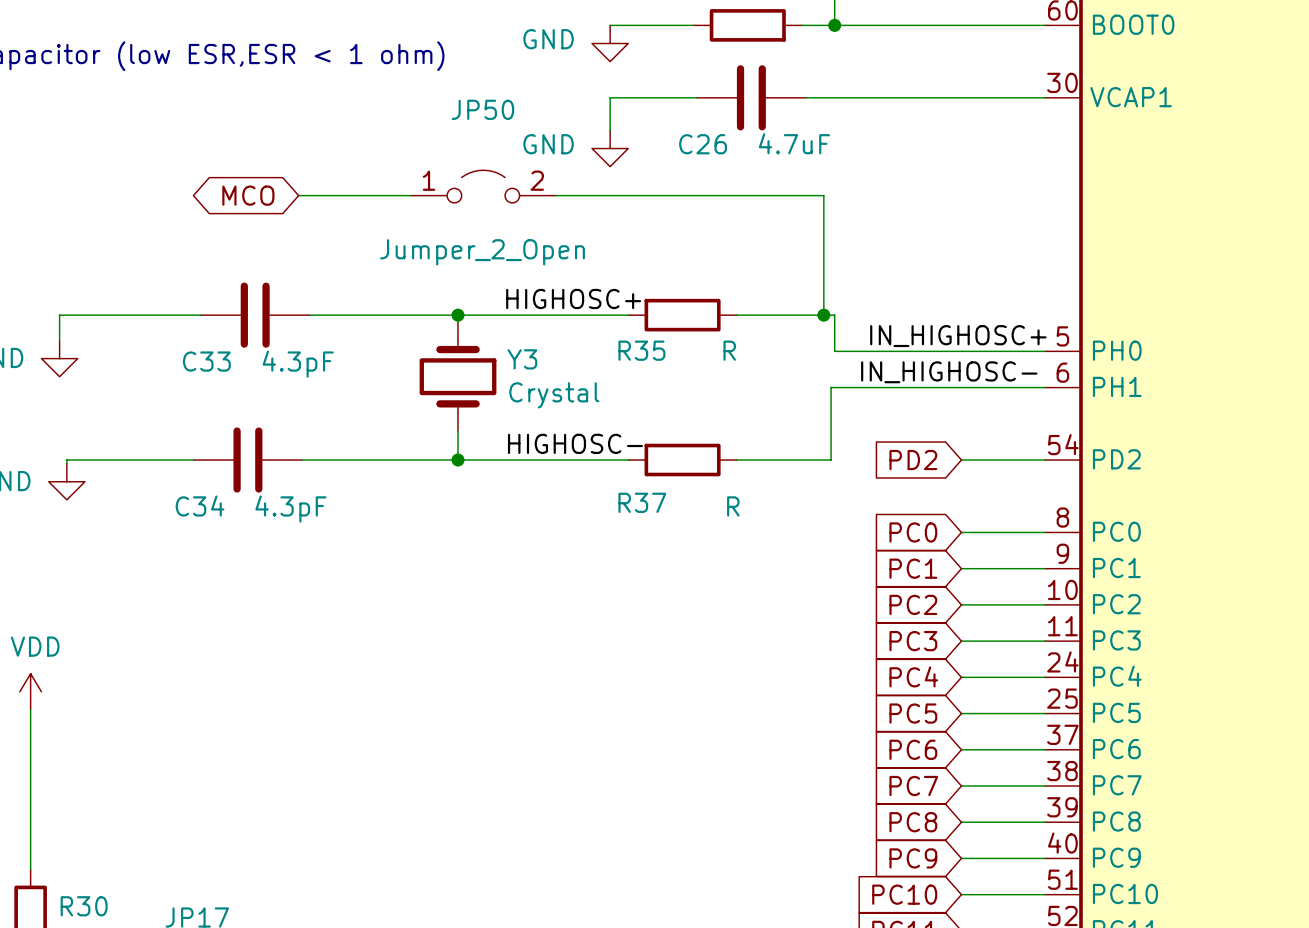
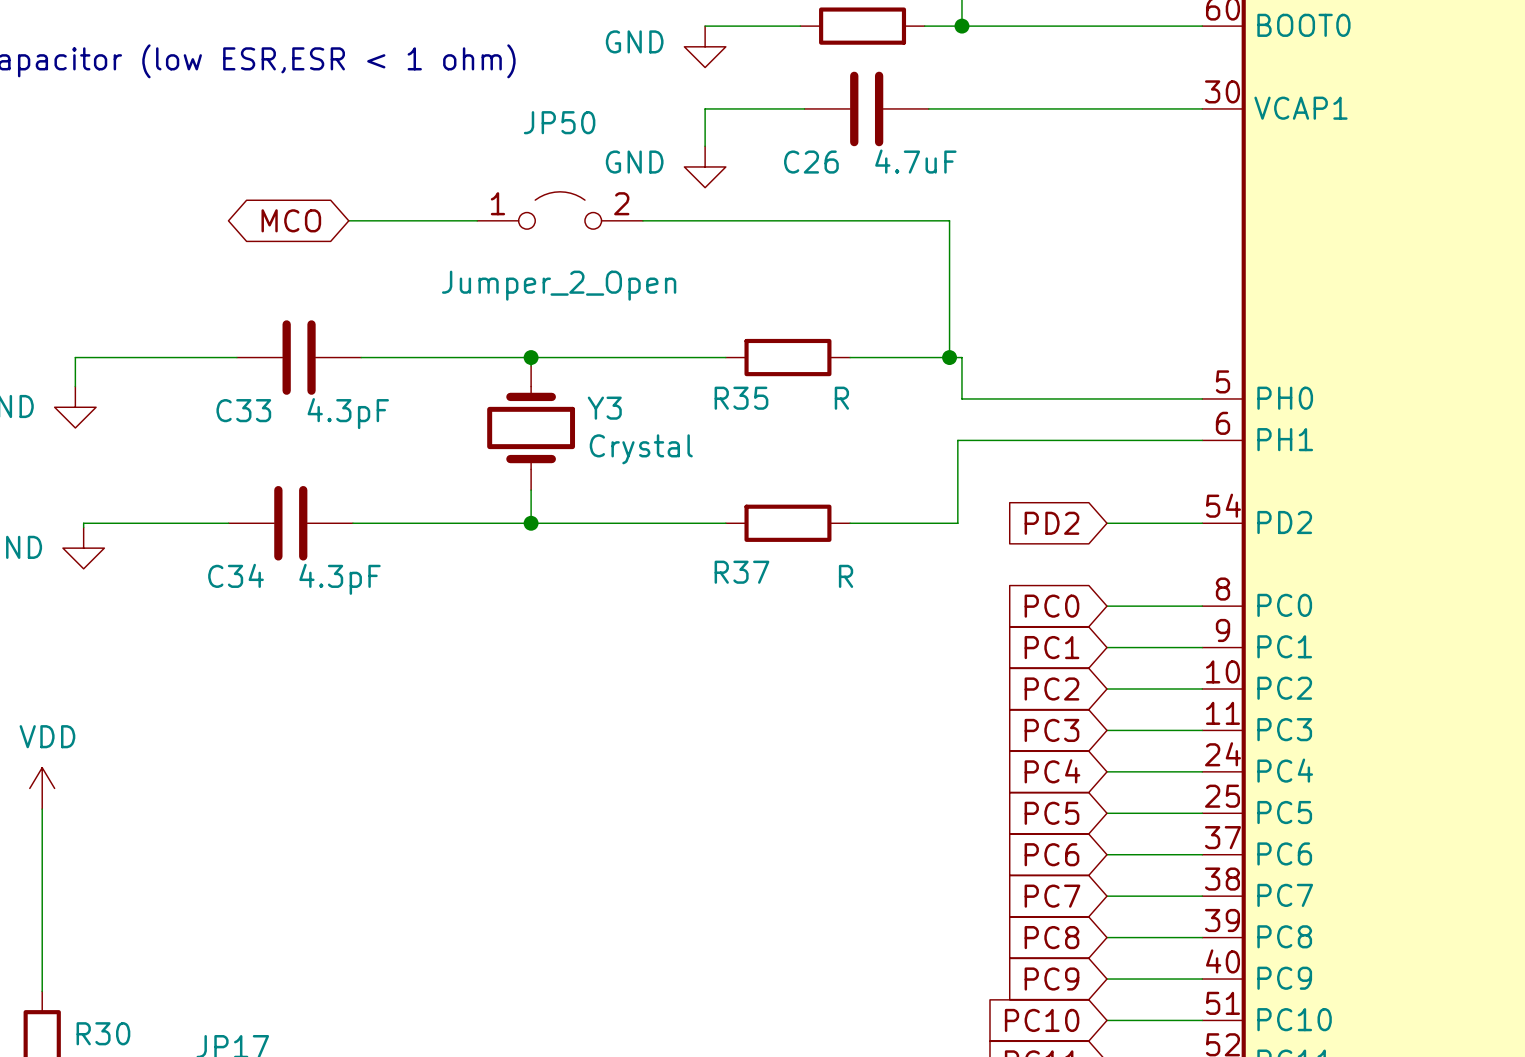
label: HIGHOSC+ (573, 298) -> none
label: IN_HIGHOSC+ (958, 336) -> none
label: IN_HIGHOSC- (949, 372) -> none
label: HIGHOSC- (575, 443) -> none

